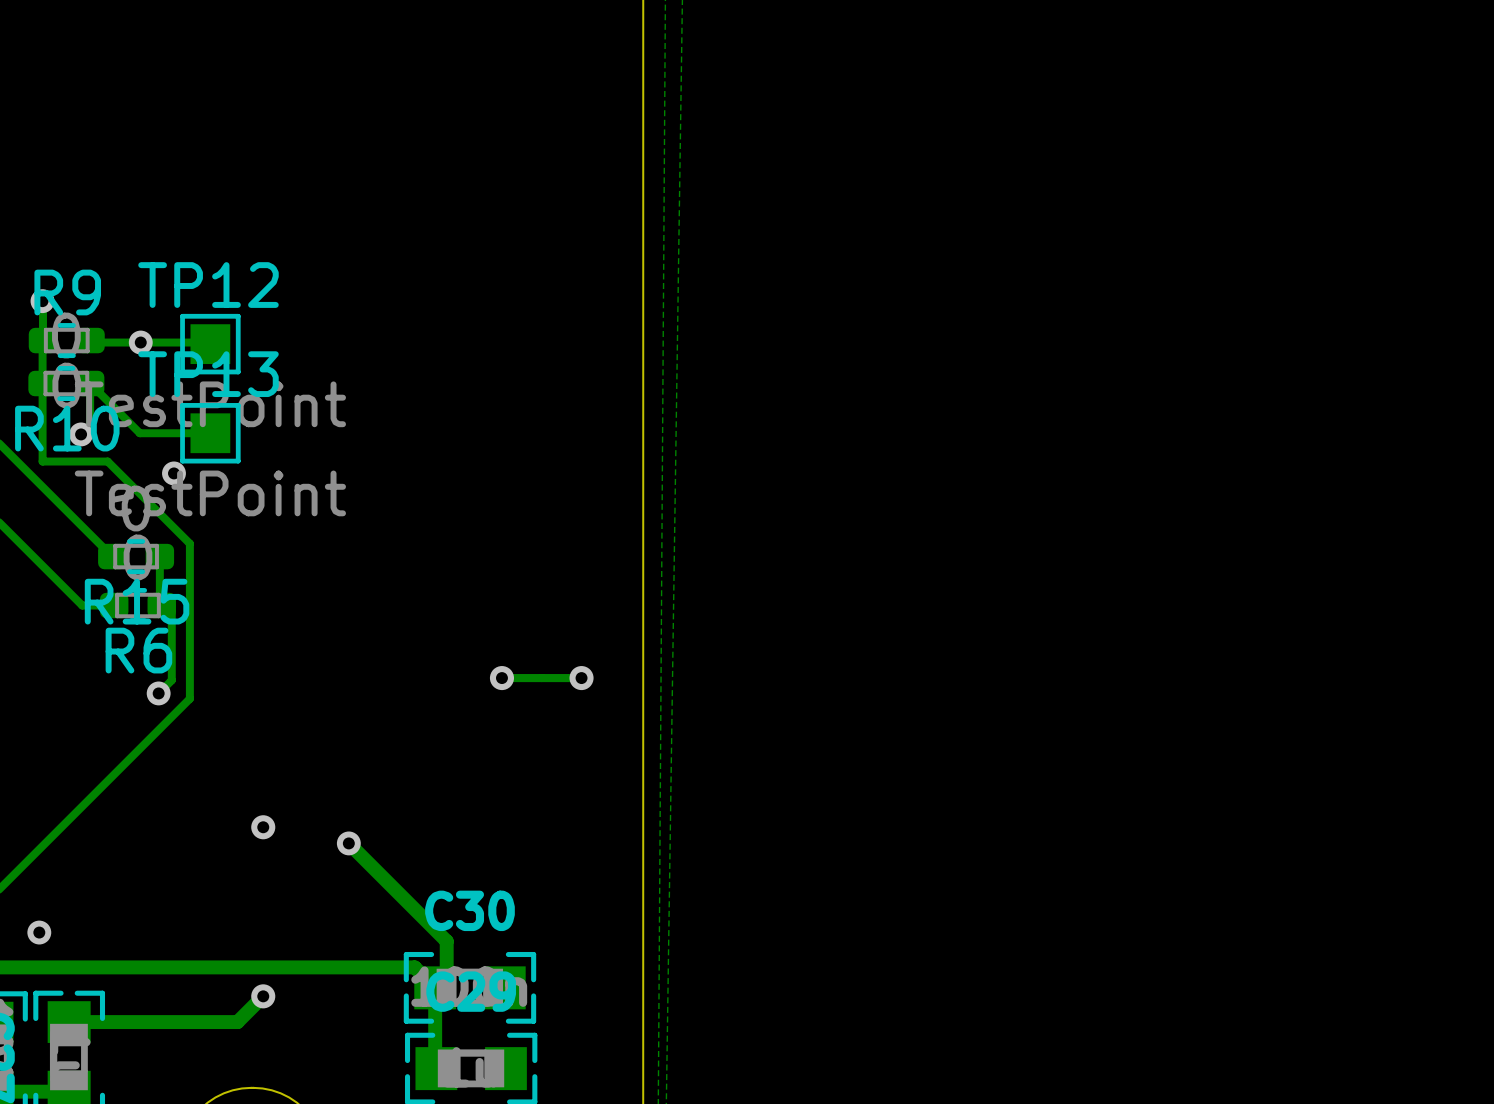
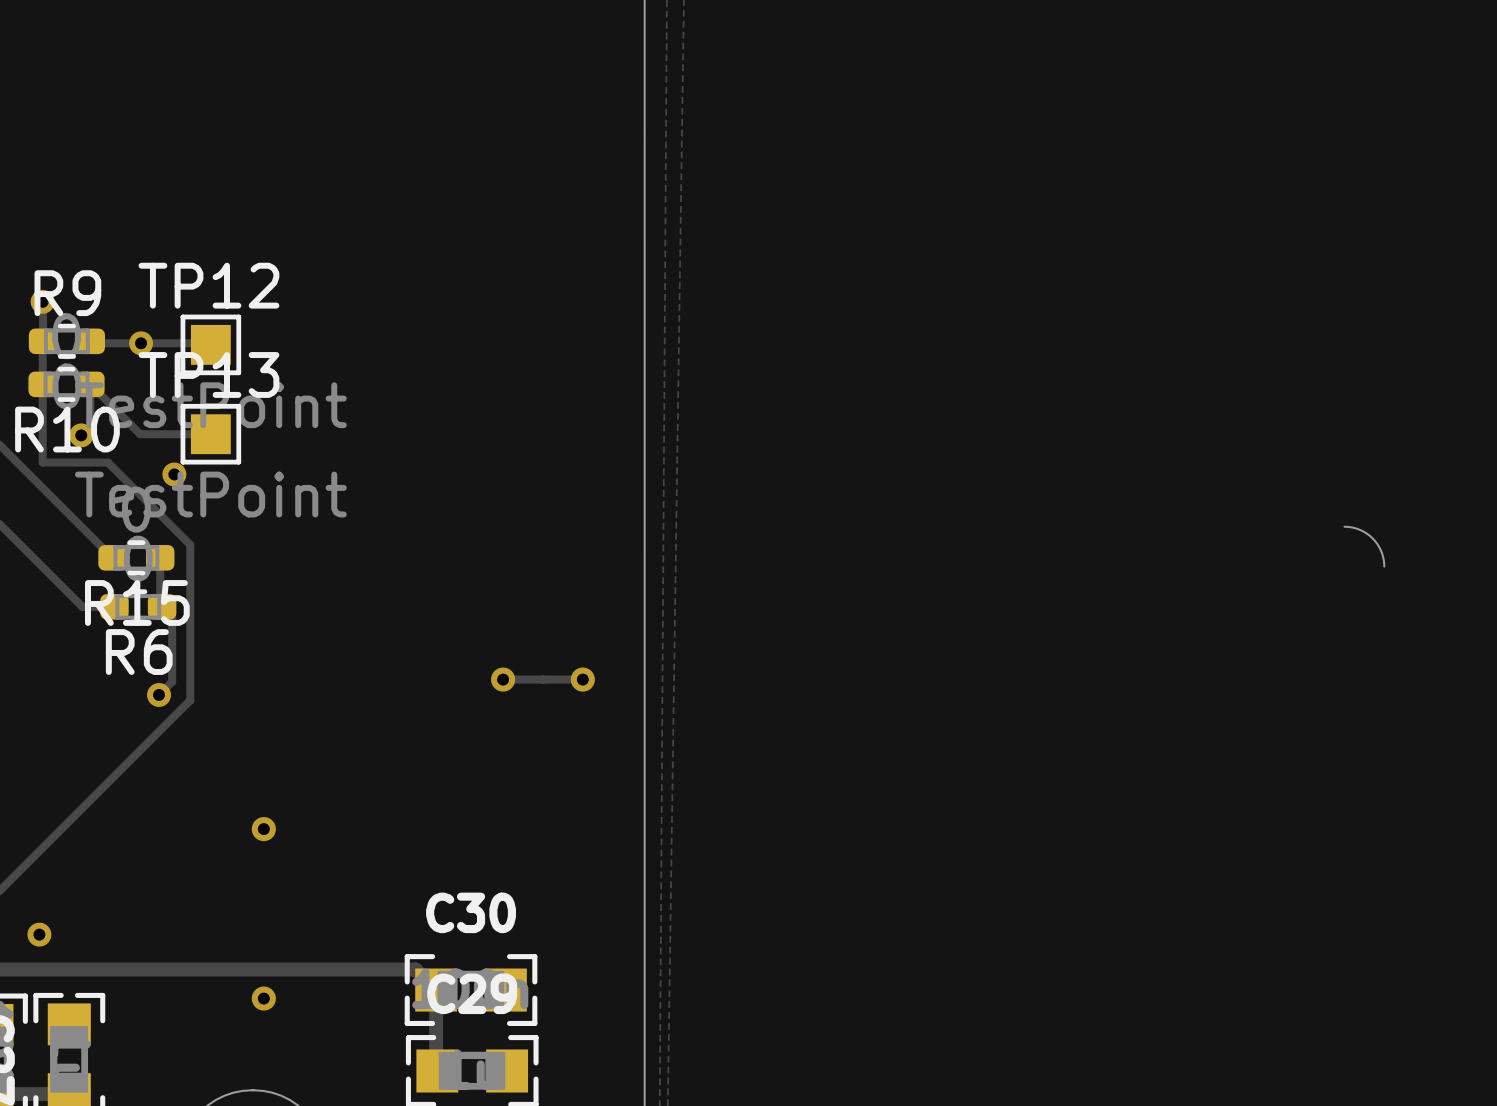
board edge: none -> (1344, 526) (1357, 528) (1372, 538) (1380, 549) (1384, 566)
track: (348, 843) (446, 941) (446, 976) (435, 987) -> none
via: (348, 843) -> none
track: (263, 996) (237, 1022) (69, 1022) -> none

